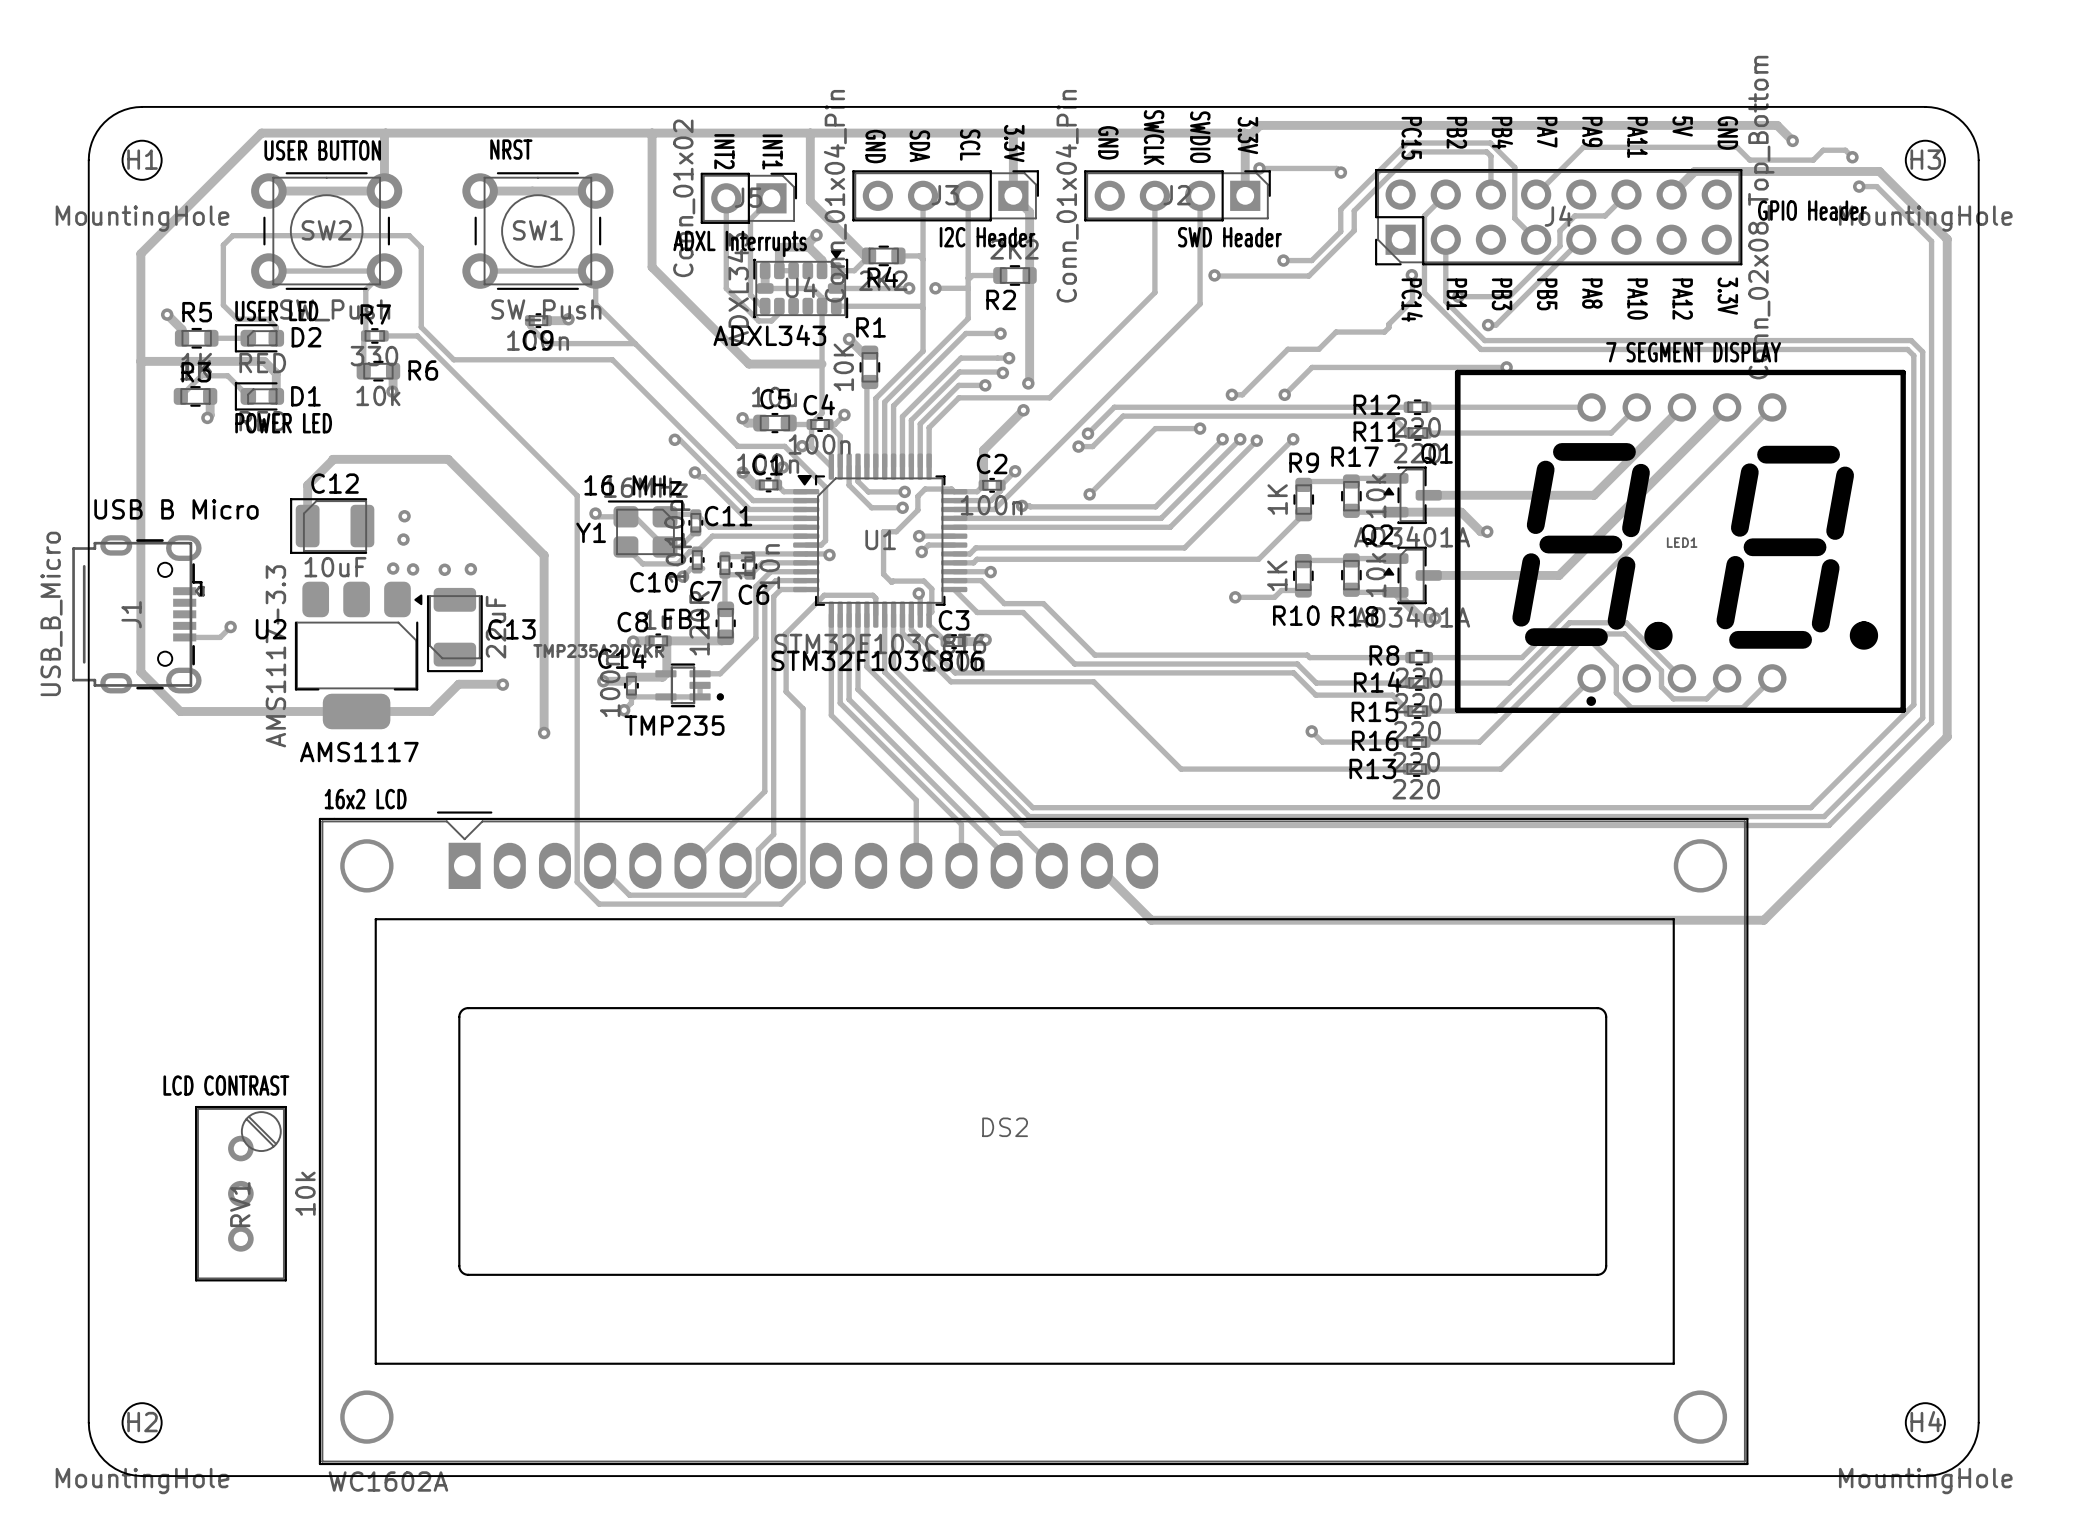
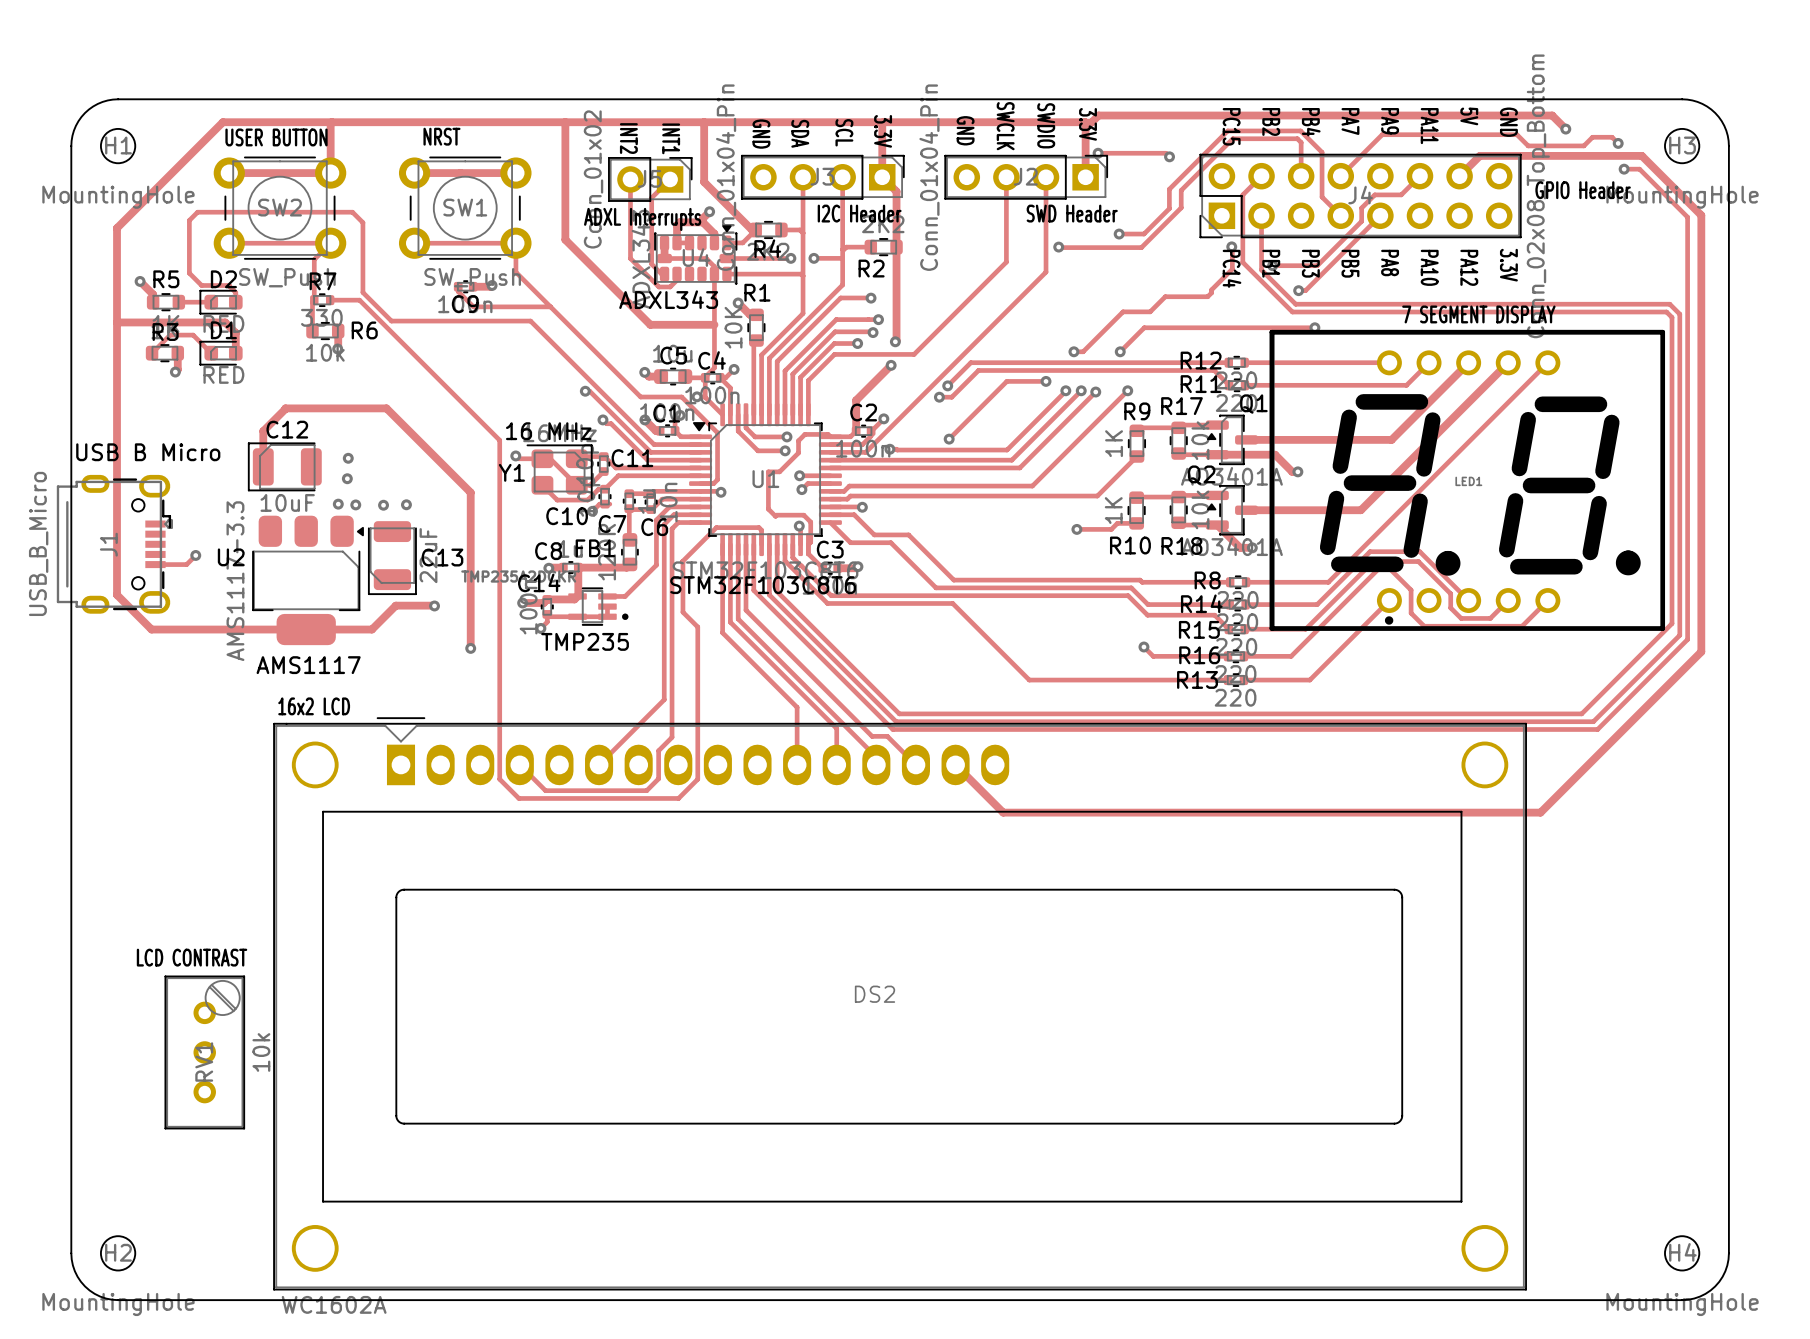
text: USER LED (276, 311) -> none
D2 name position: D2 (306, 337) -> D2 (223, 279)
D1 name position: D1 (305, 396) -> D1 (223, 330)
text: POWER LED (283, 423) -> none

